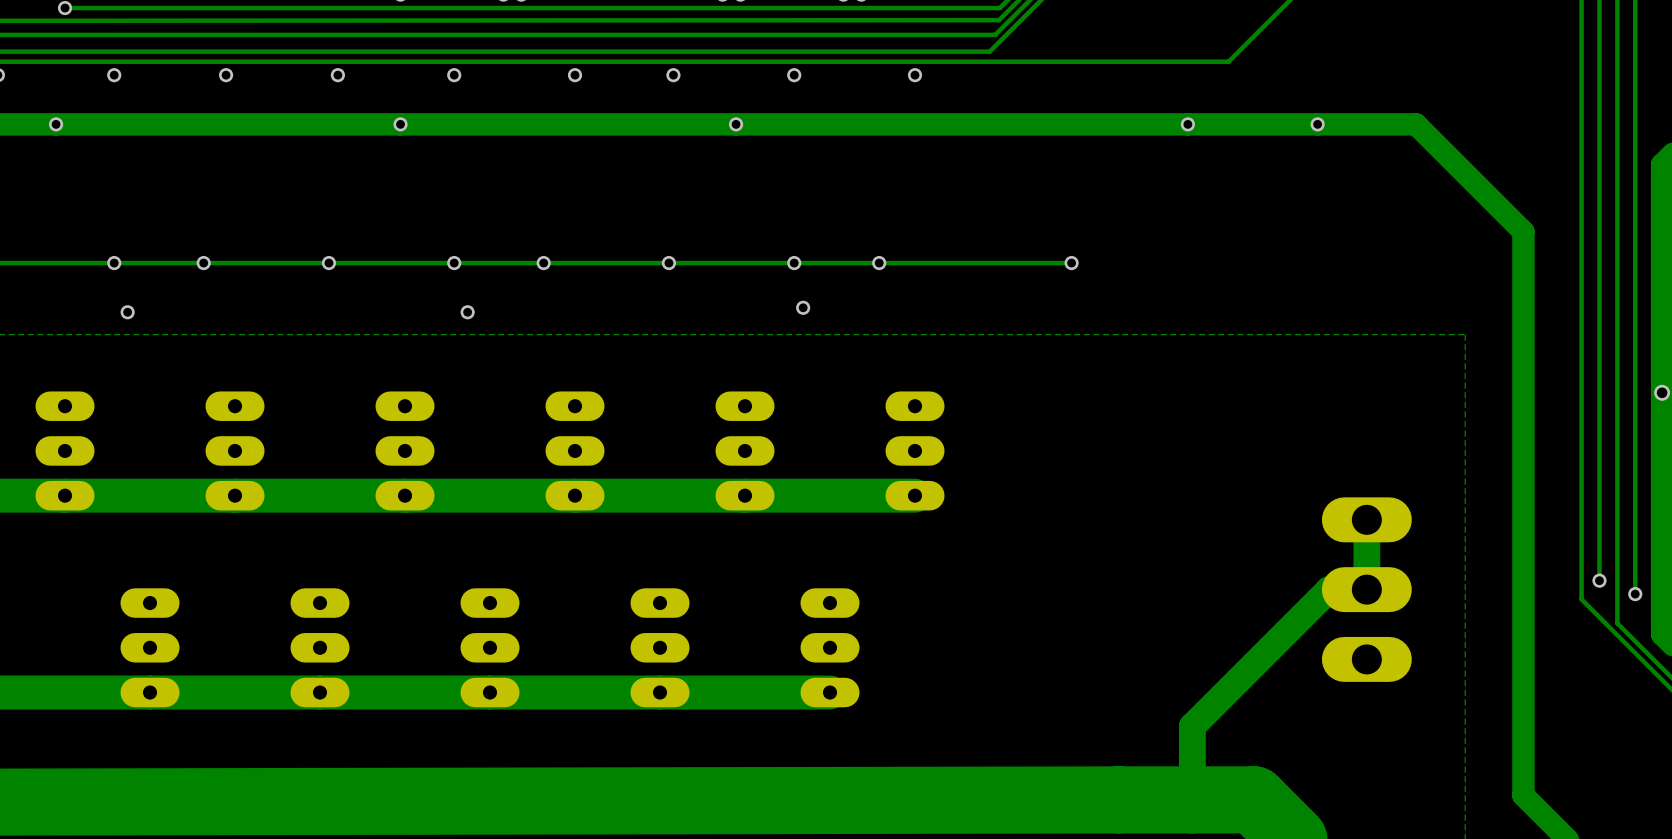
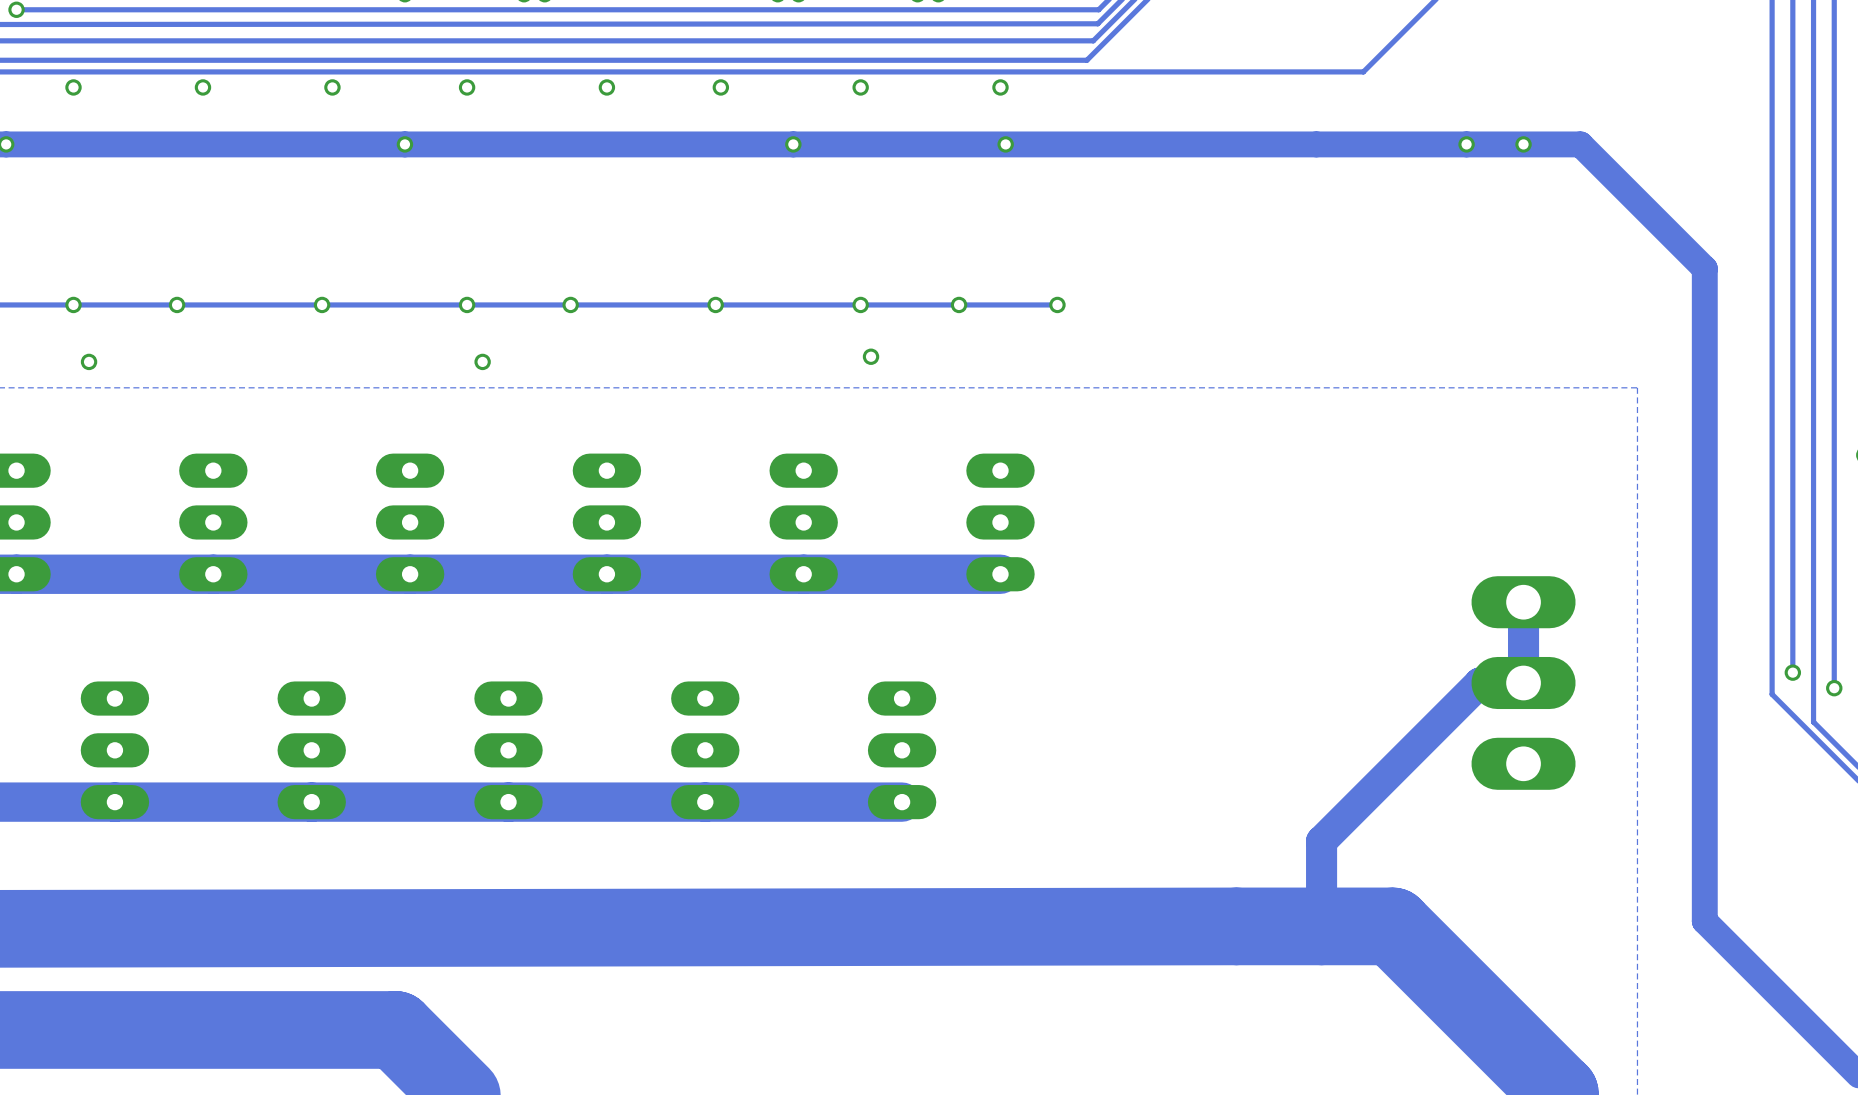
via: none -> (1005, 144)
via: (1187, 124) -> none
via: none -> (1523, 144)
via: none -> (1057, 304)
track: (1071, 263) (964, 263) -> none
via: (1071, 263) -> none

